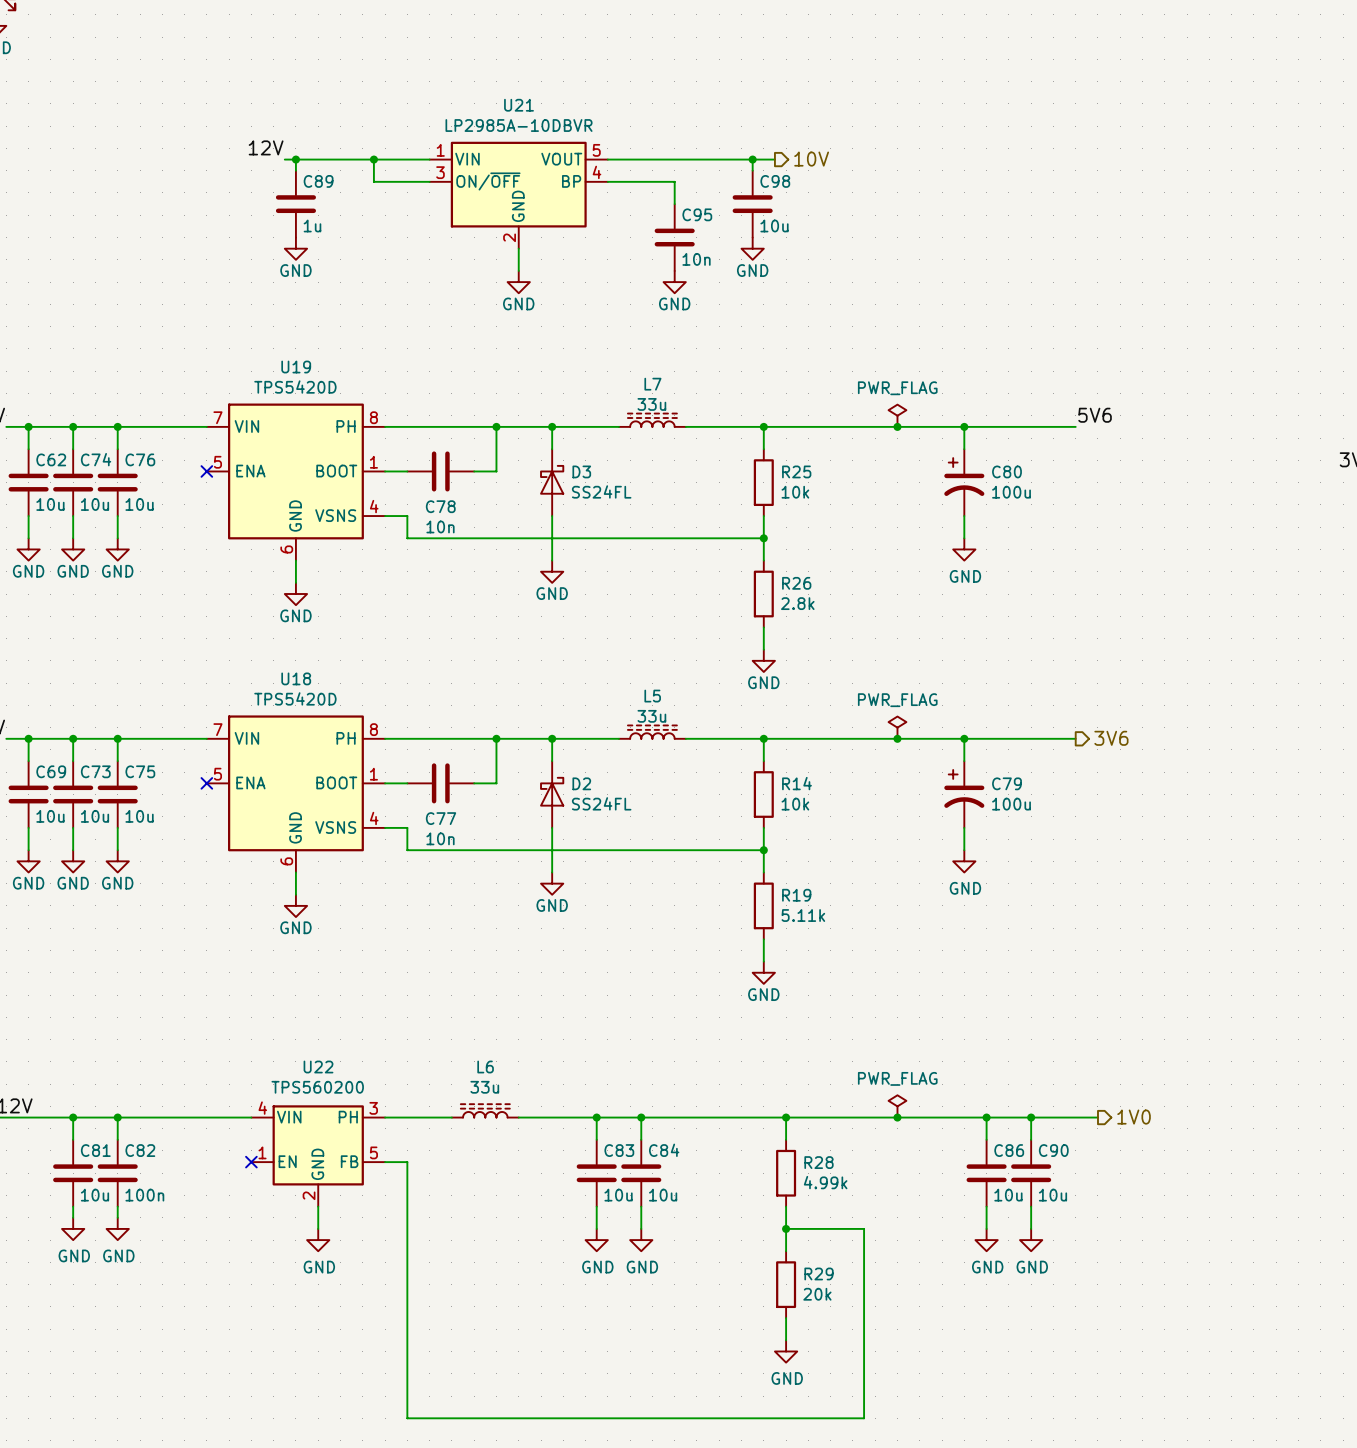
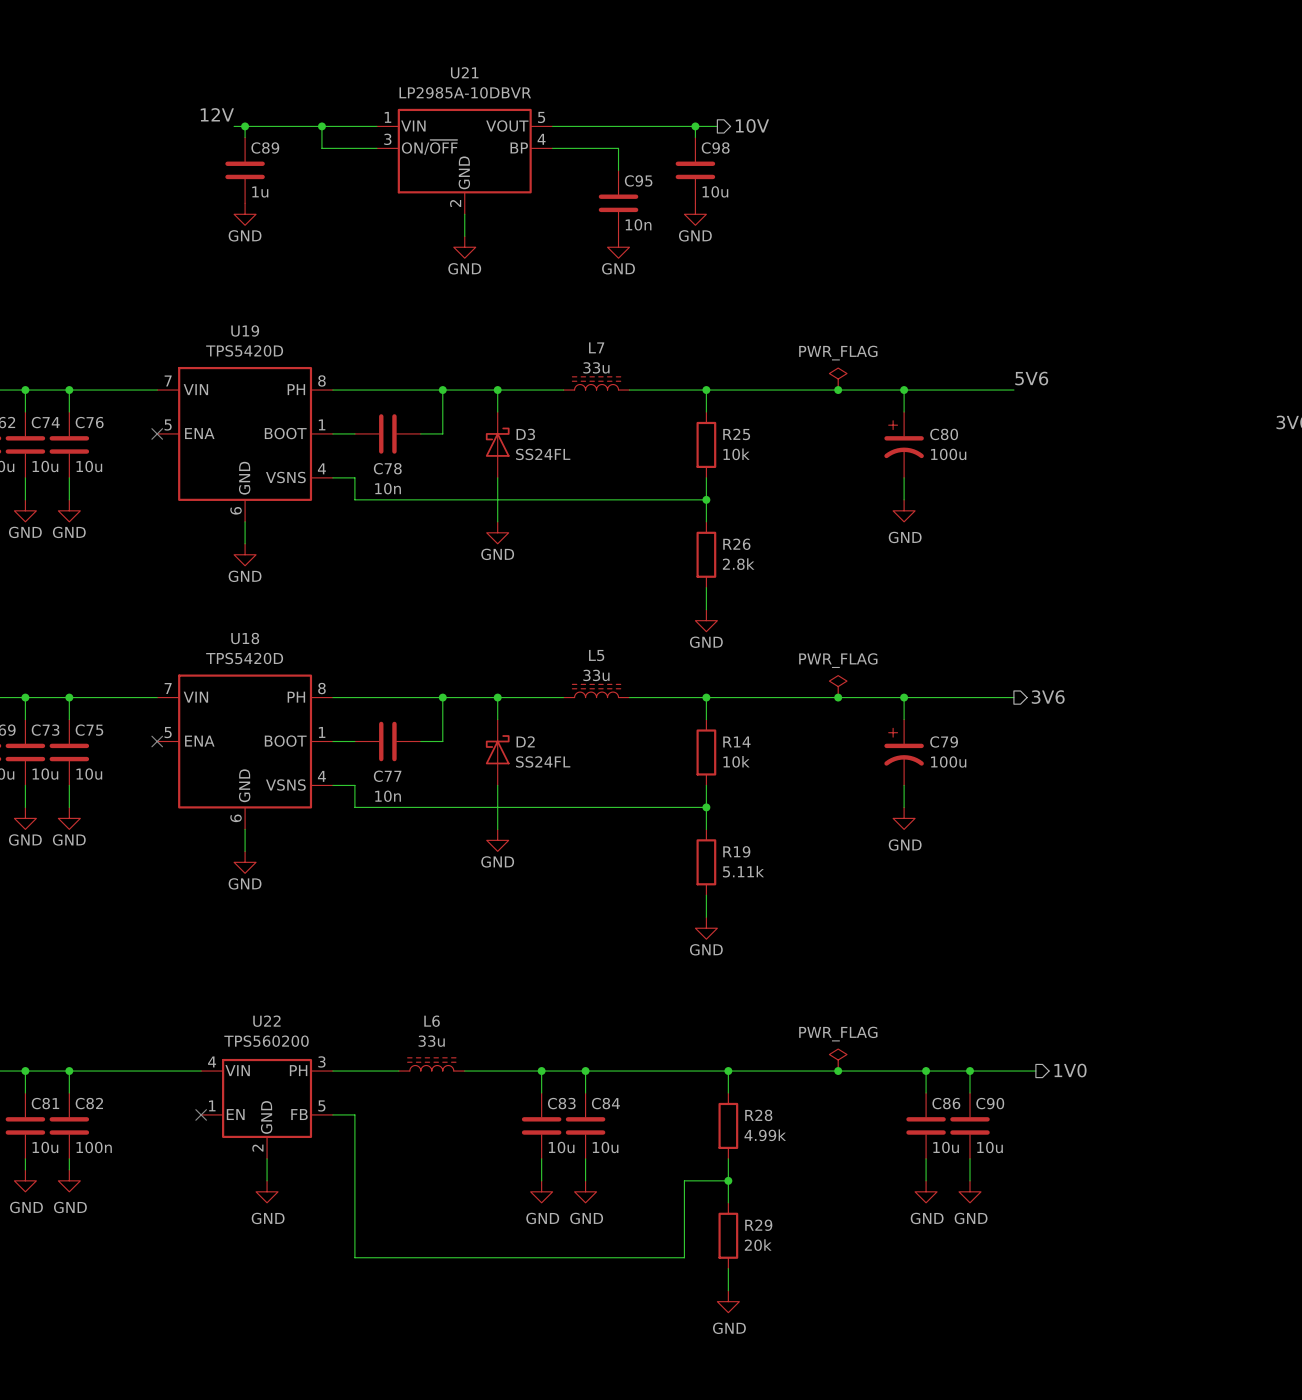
wire: (786, 1228) (864, 1228) (864, 1418) (407, 1418) (407, 1306) -> (728, 1180) (684, 1180) (684, 1257) (354, 1257)

